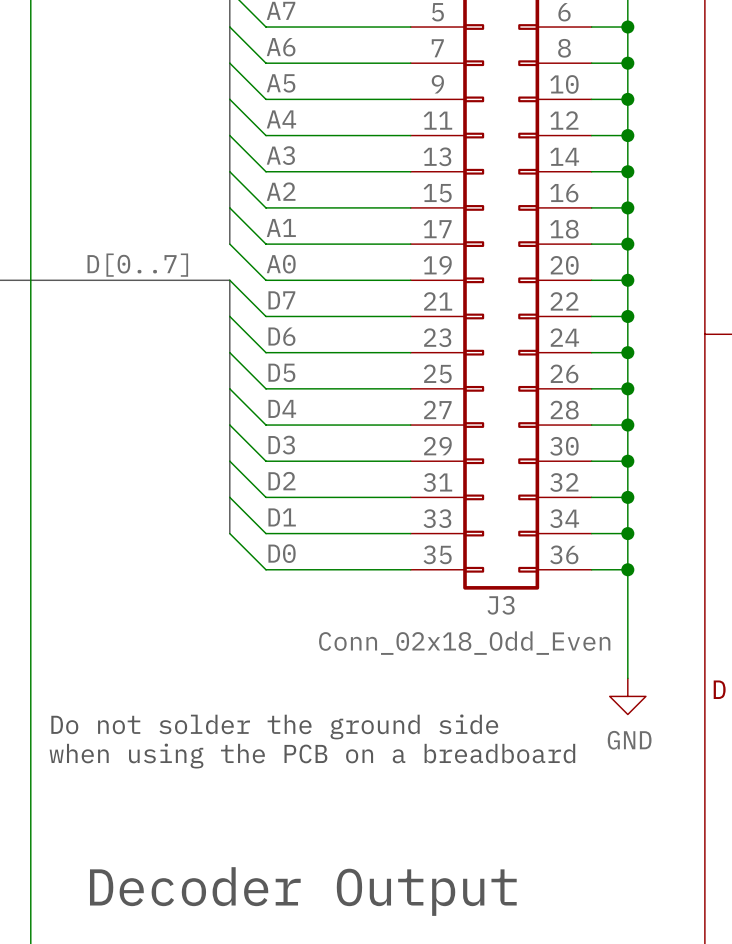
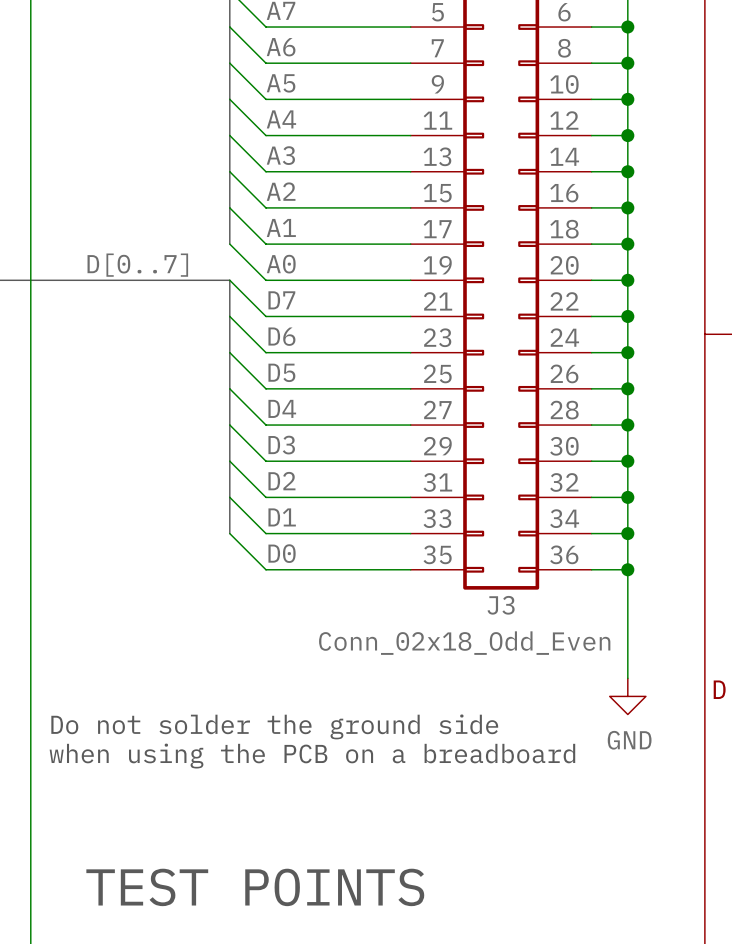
text: Decoder Output (303, 891) -> TEST POINTS (255, 887)

